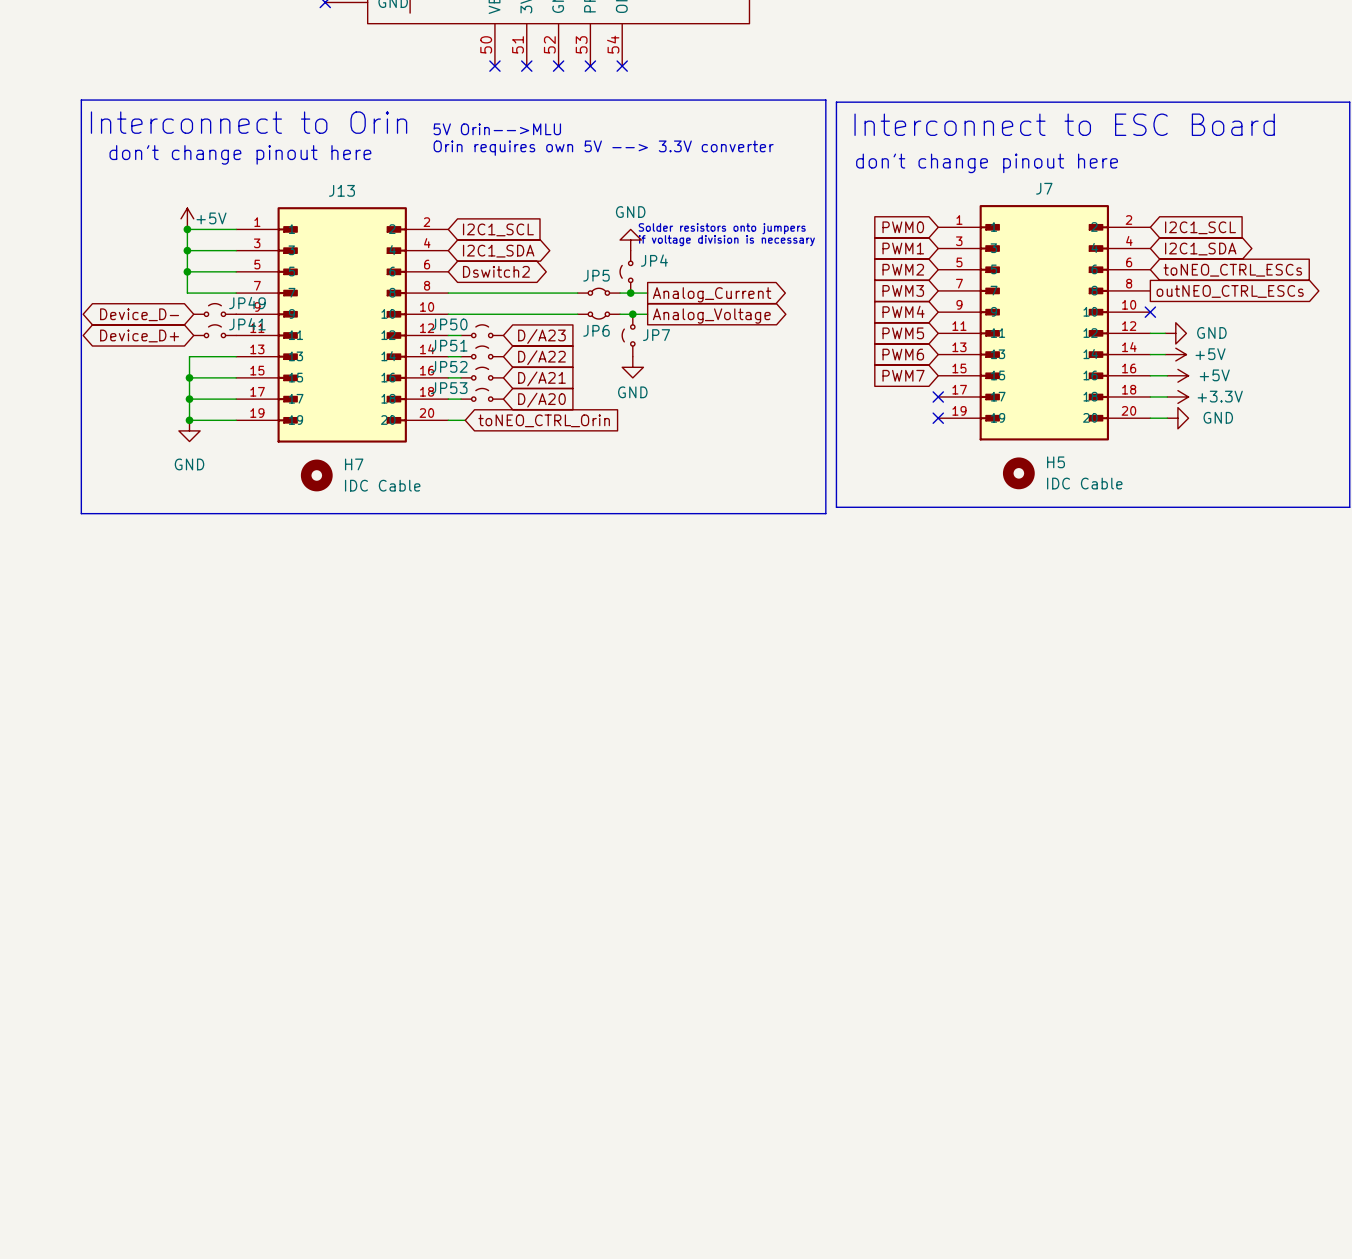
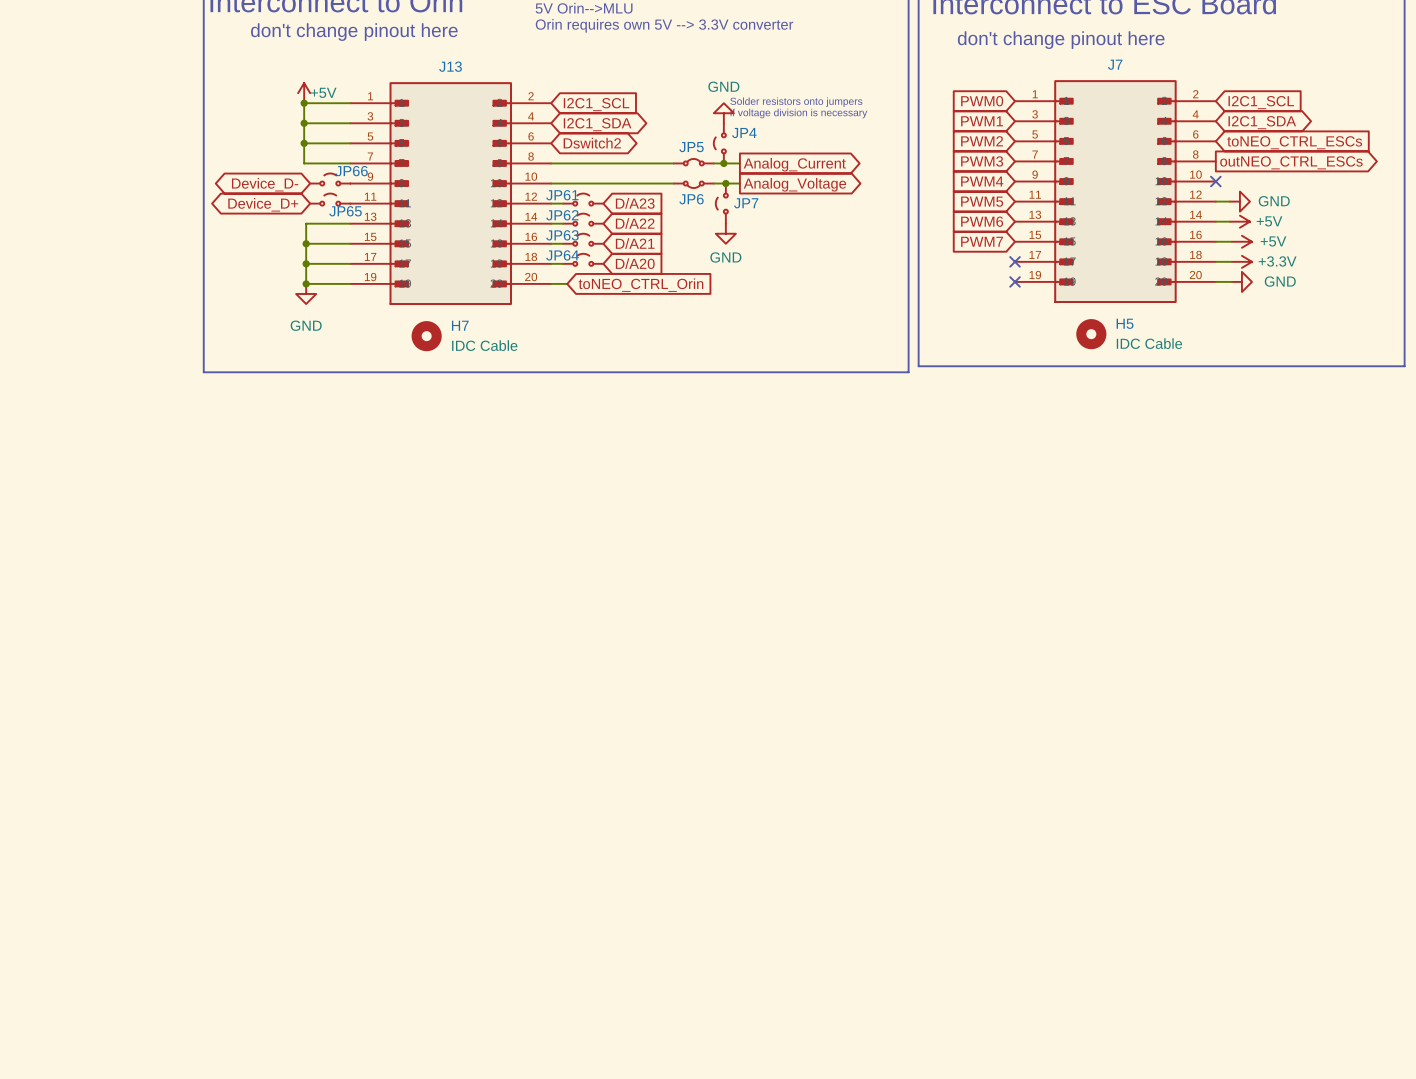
JP49 name: JP49 (247, 303) -> JP66 (351, 171)
JP41 name: JP41 (247, 324) -> JP65 (345, 211)
JP50 name: JP50 (449, 324) -> JP61 (562, 195)
JP51 name: JP51 (449, 345) -> JP62 (562, 215)
JP52 name: JP52 (449, 366) -> JP63 (562, 235)
JP53 name: JP53 (449, 388) -> JP64 (562, 255)

